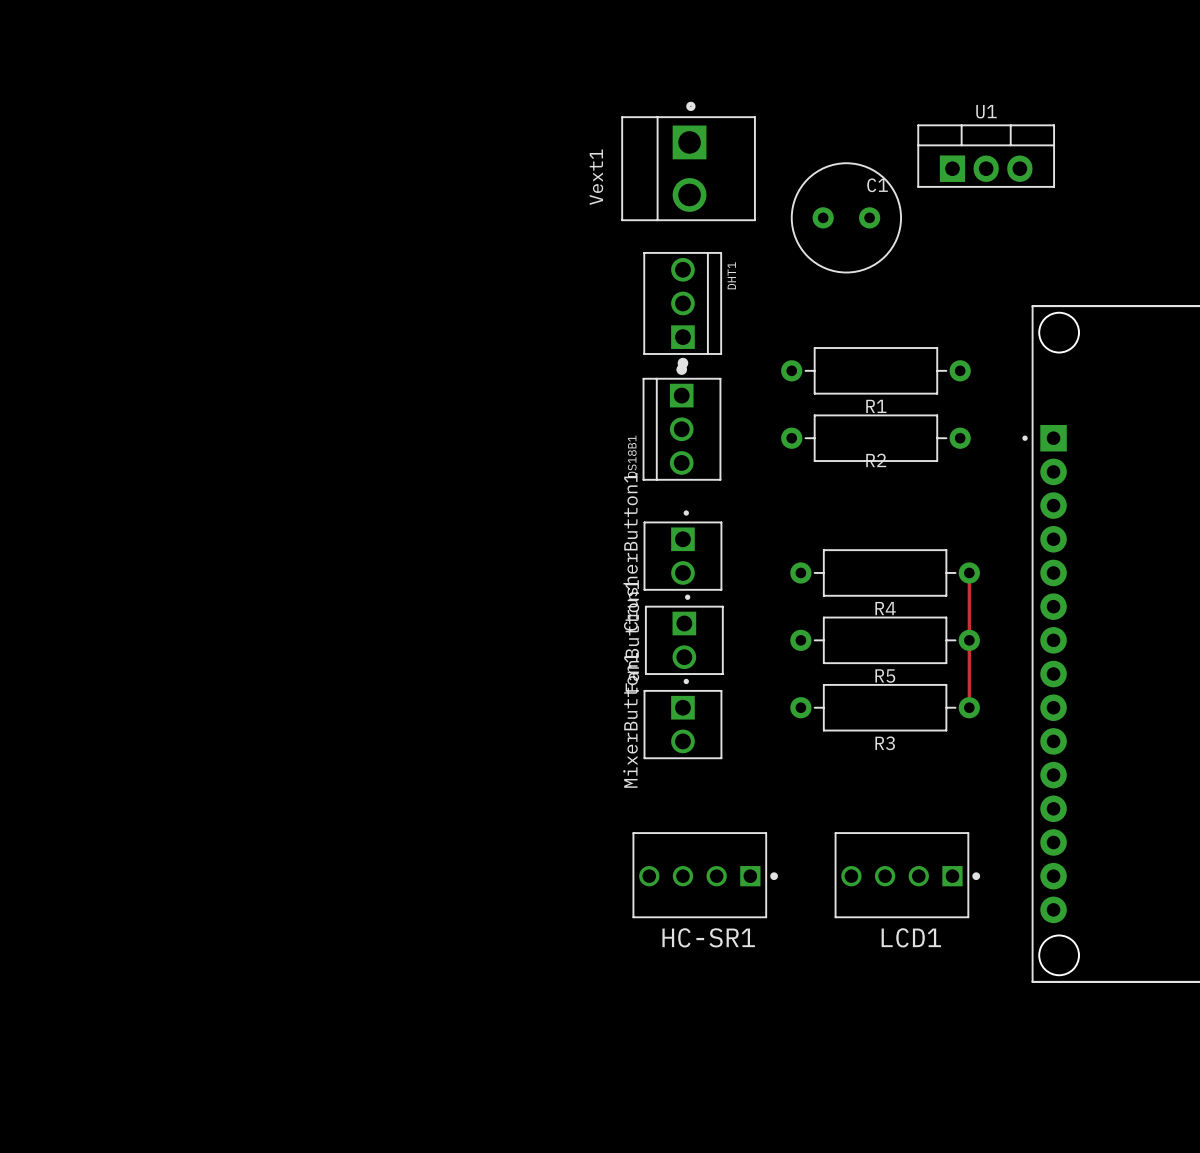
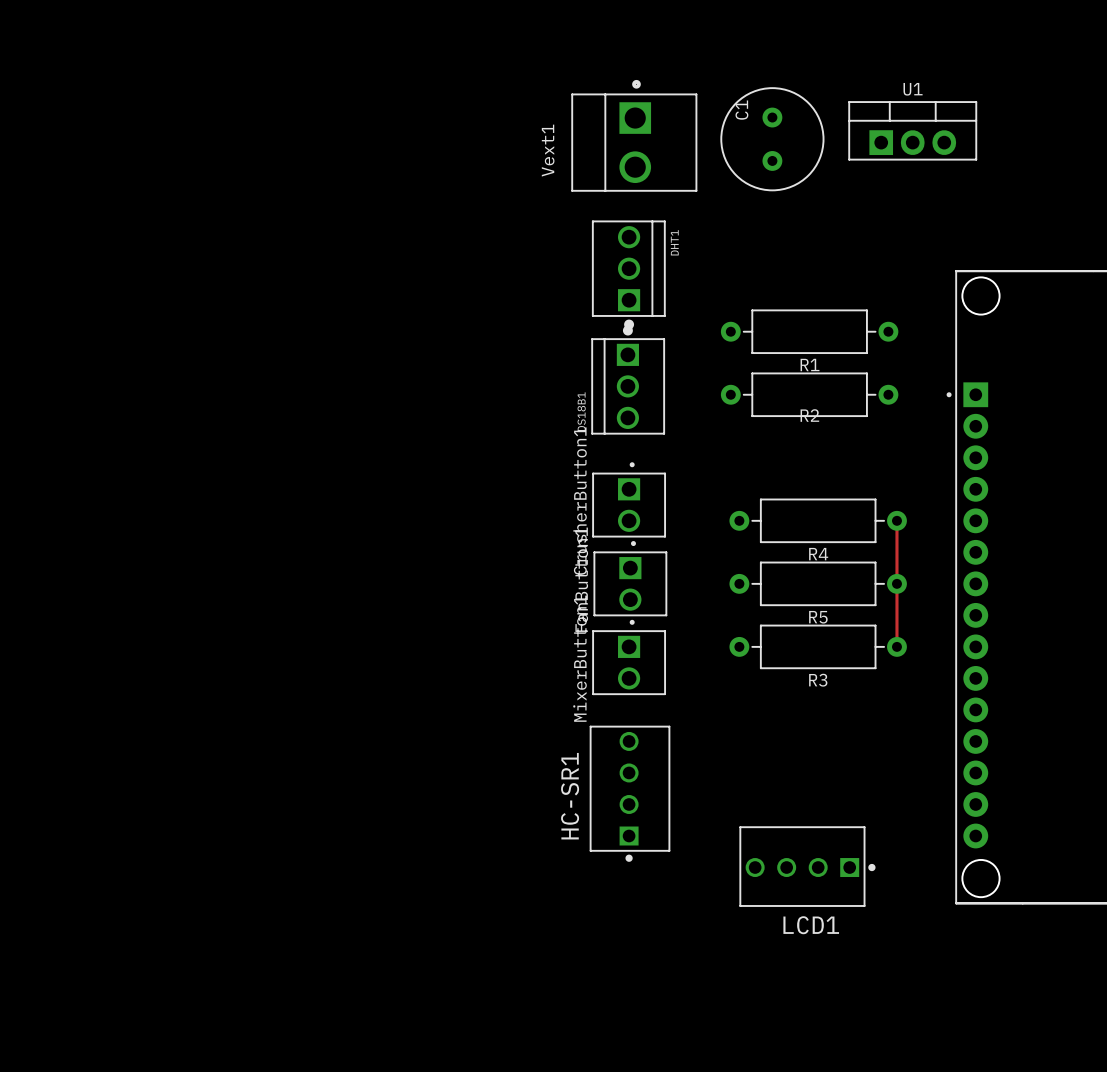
C1 name position: C1 (877, 185) -> C1 (741, 110)
C1 rotation: 0° (846, 217) -> 90° clockwise (772, 139)
HC-SR1 rotation: 0° (705, 875) -> 90° clockwise (630, 793)
LCD1 position: (907, 875) -> (807, 866)

